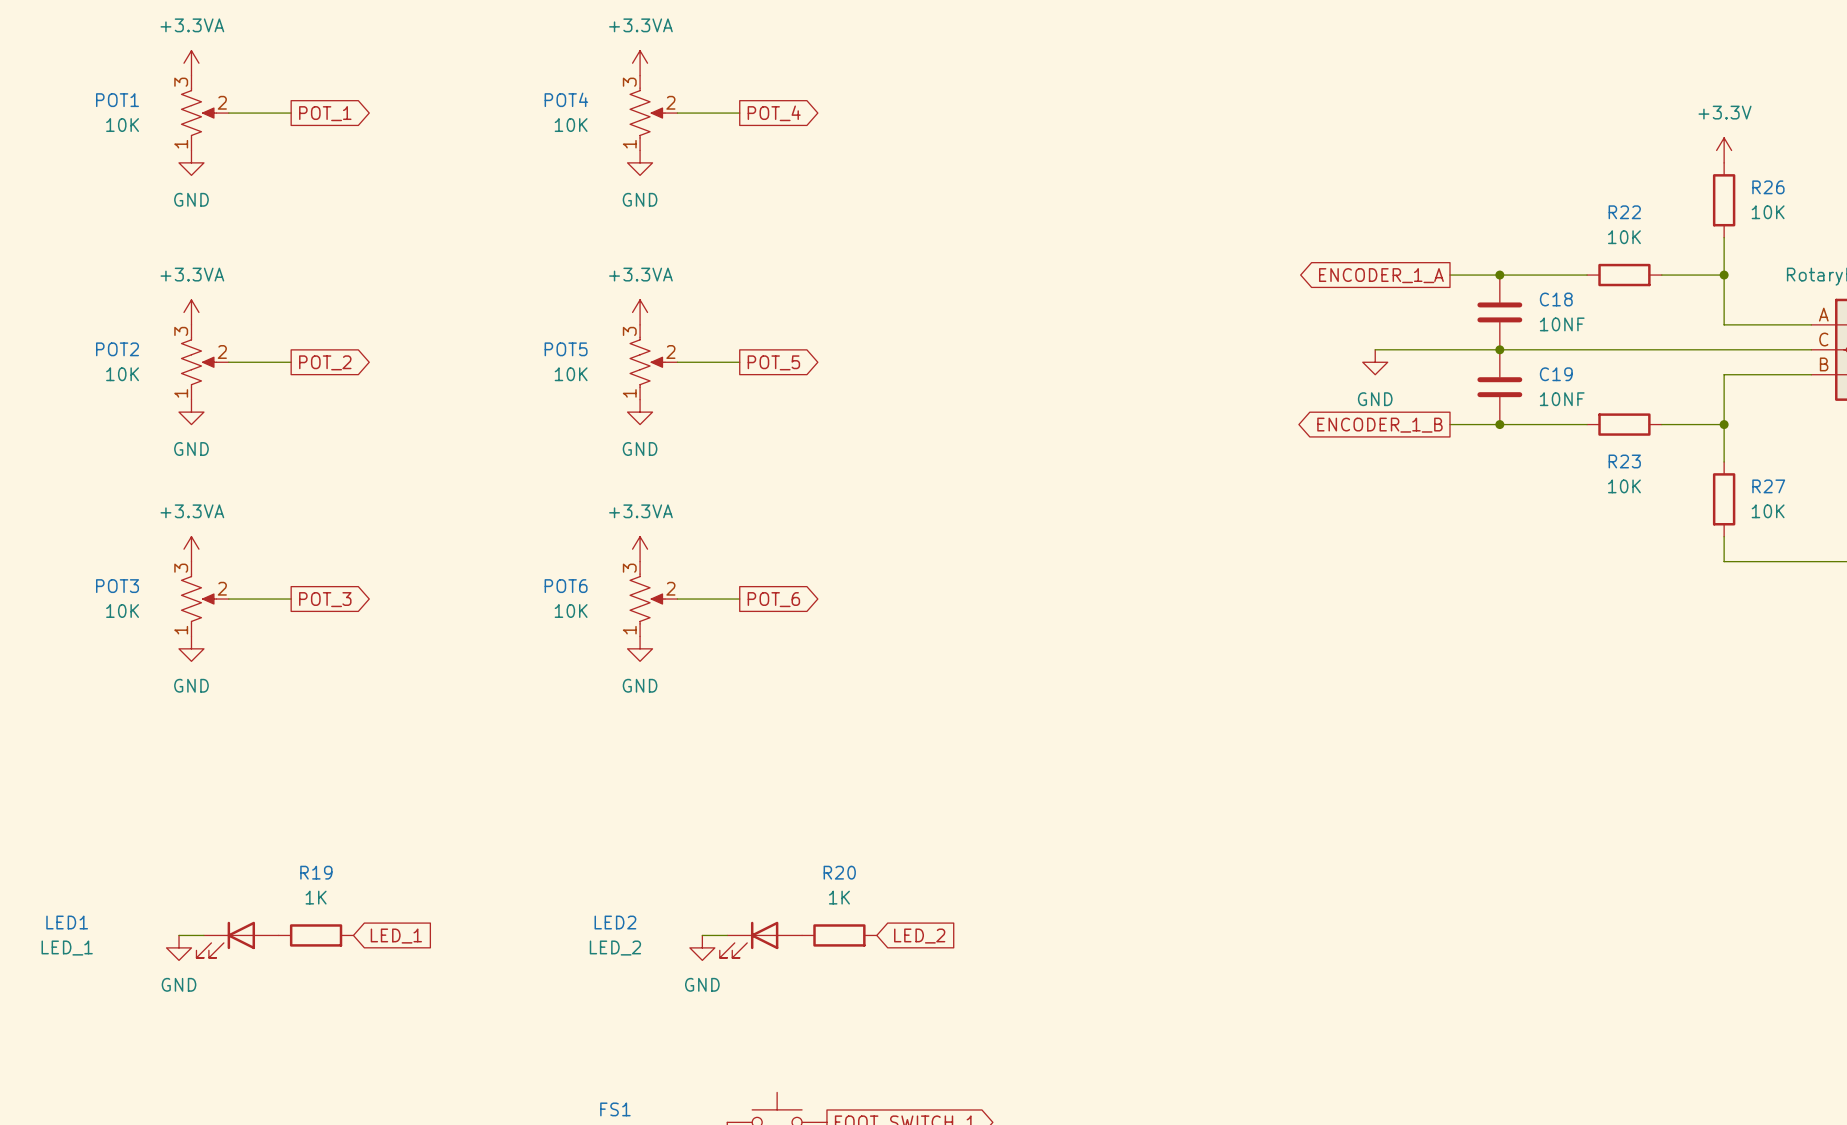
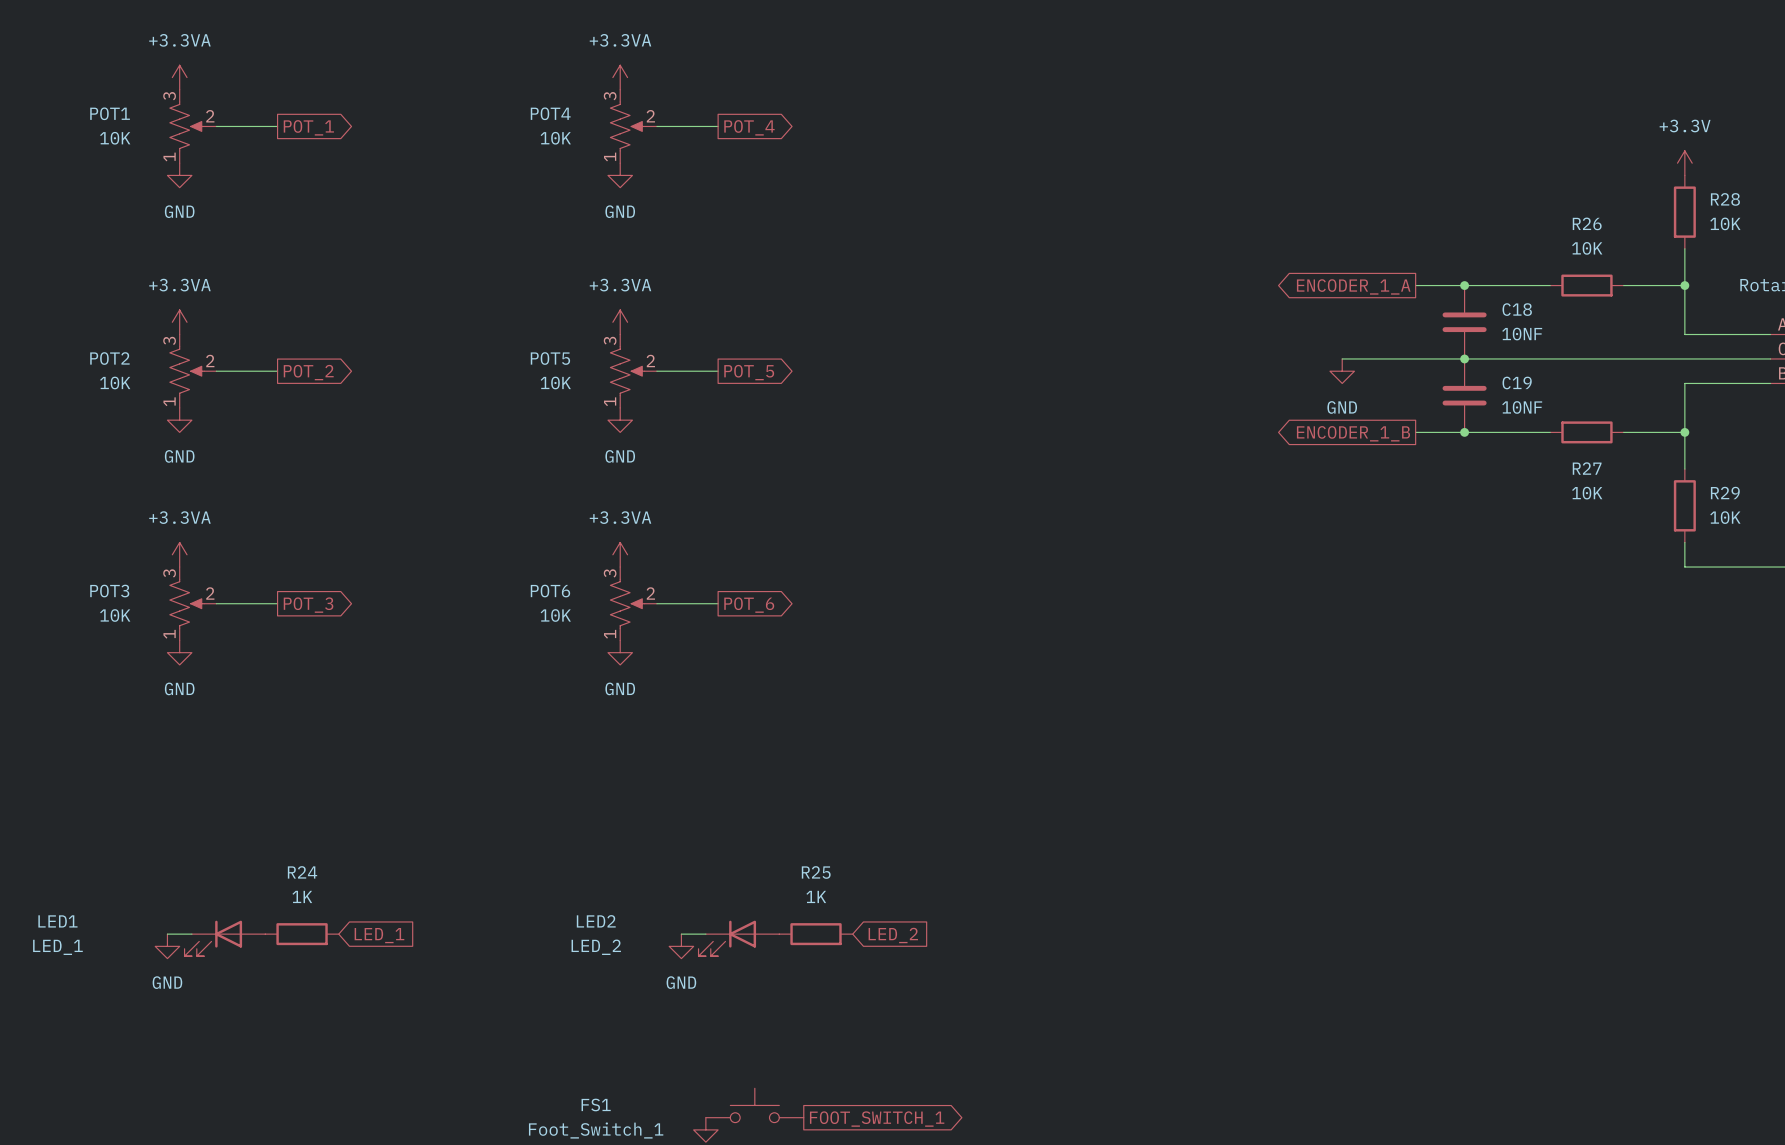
R26 name: R26 (1768, 187) -> R28 (1725, 199)
R22 name: R22 (1624, 212) -> R26 (1587, 223)
R23 name: R23 (1624, 461) -> R27 (1587, 468)
R27 name: R27 (1768, 486) -> R29 (1725, 493)
R19 name: R19 (316, 872) -> R24 (302, 872)
R20 name: R20 (839, 872) -> R25 (816, 872)

